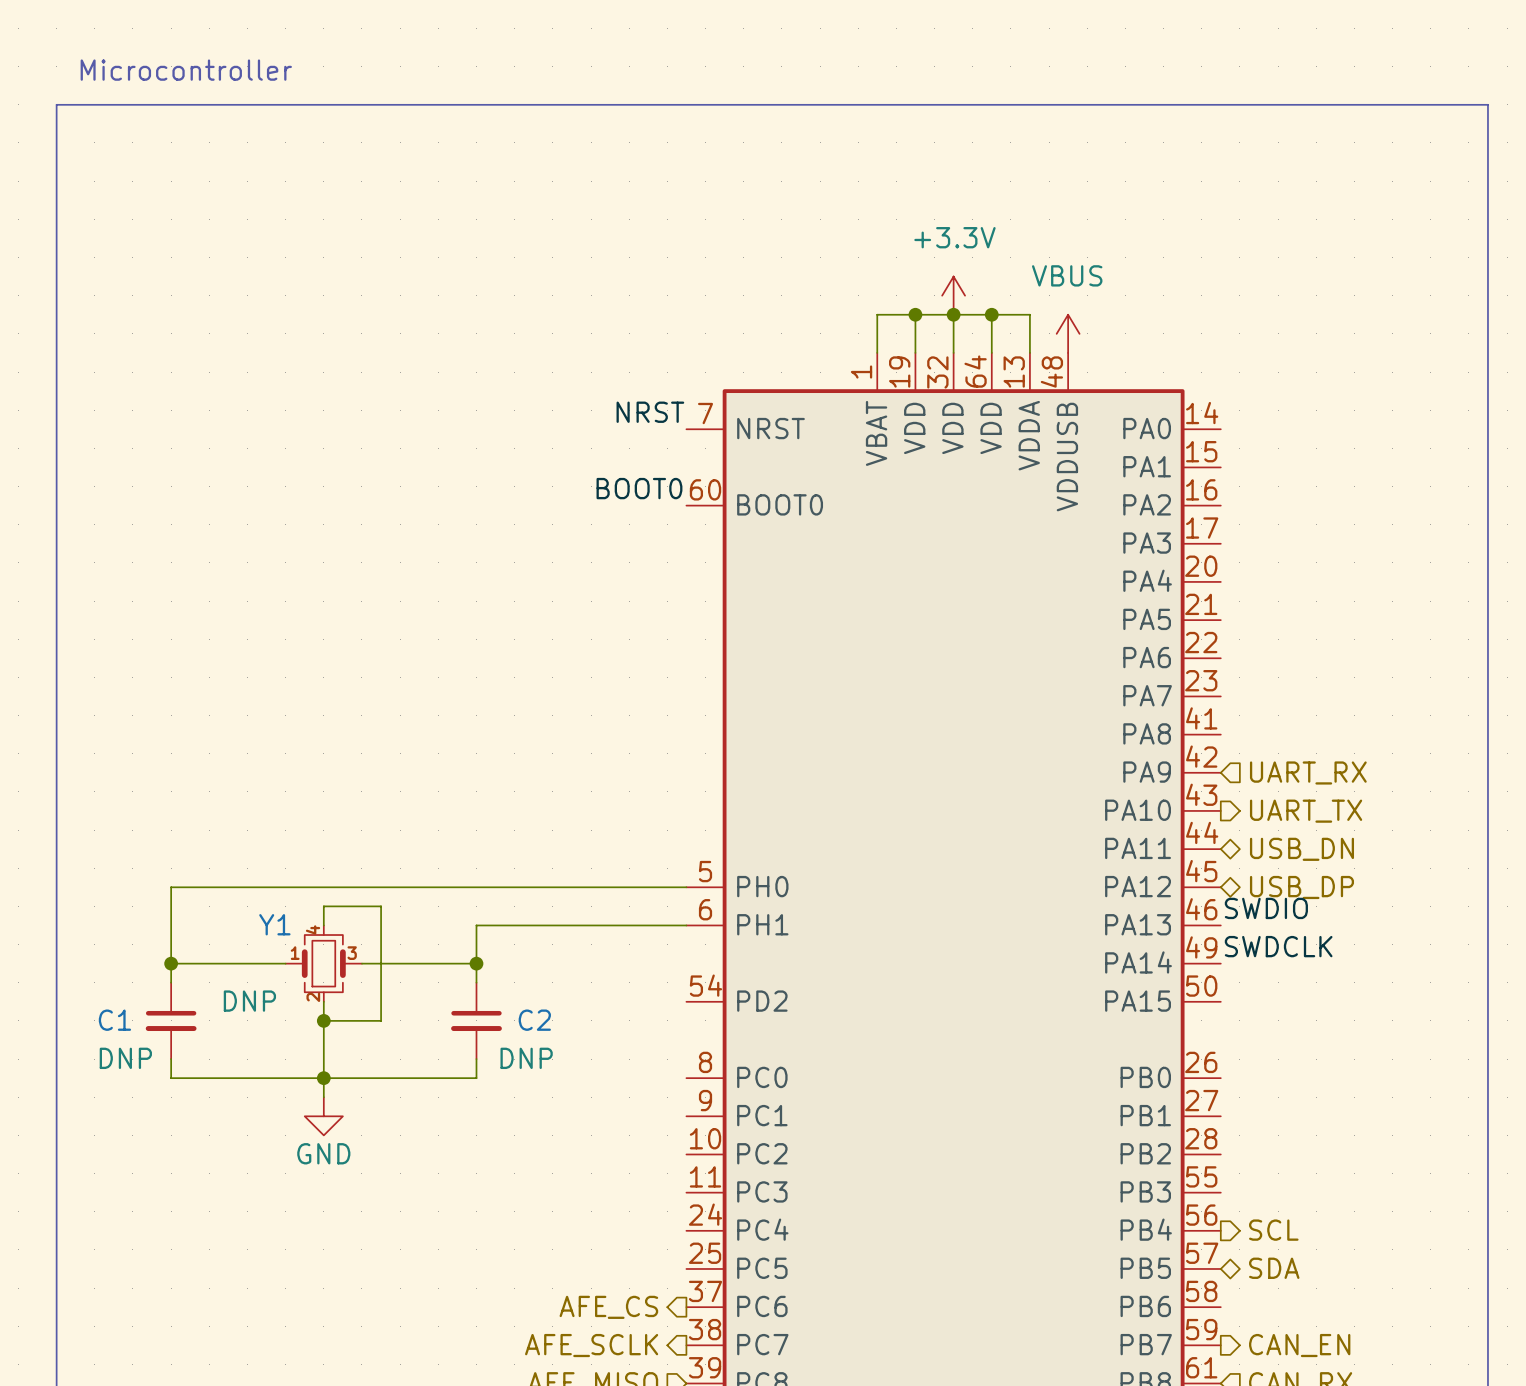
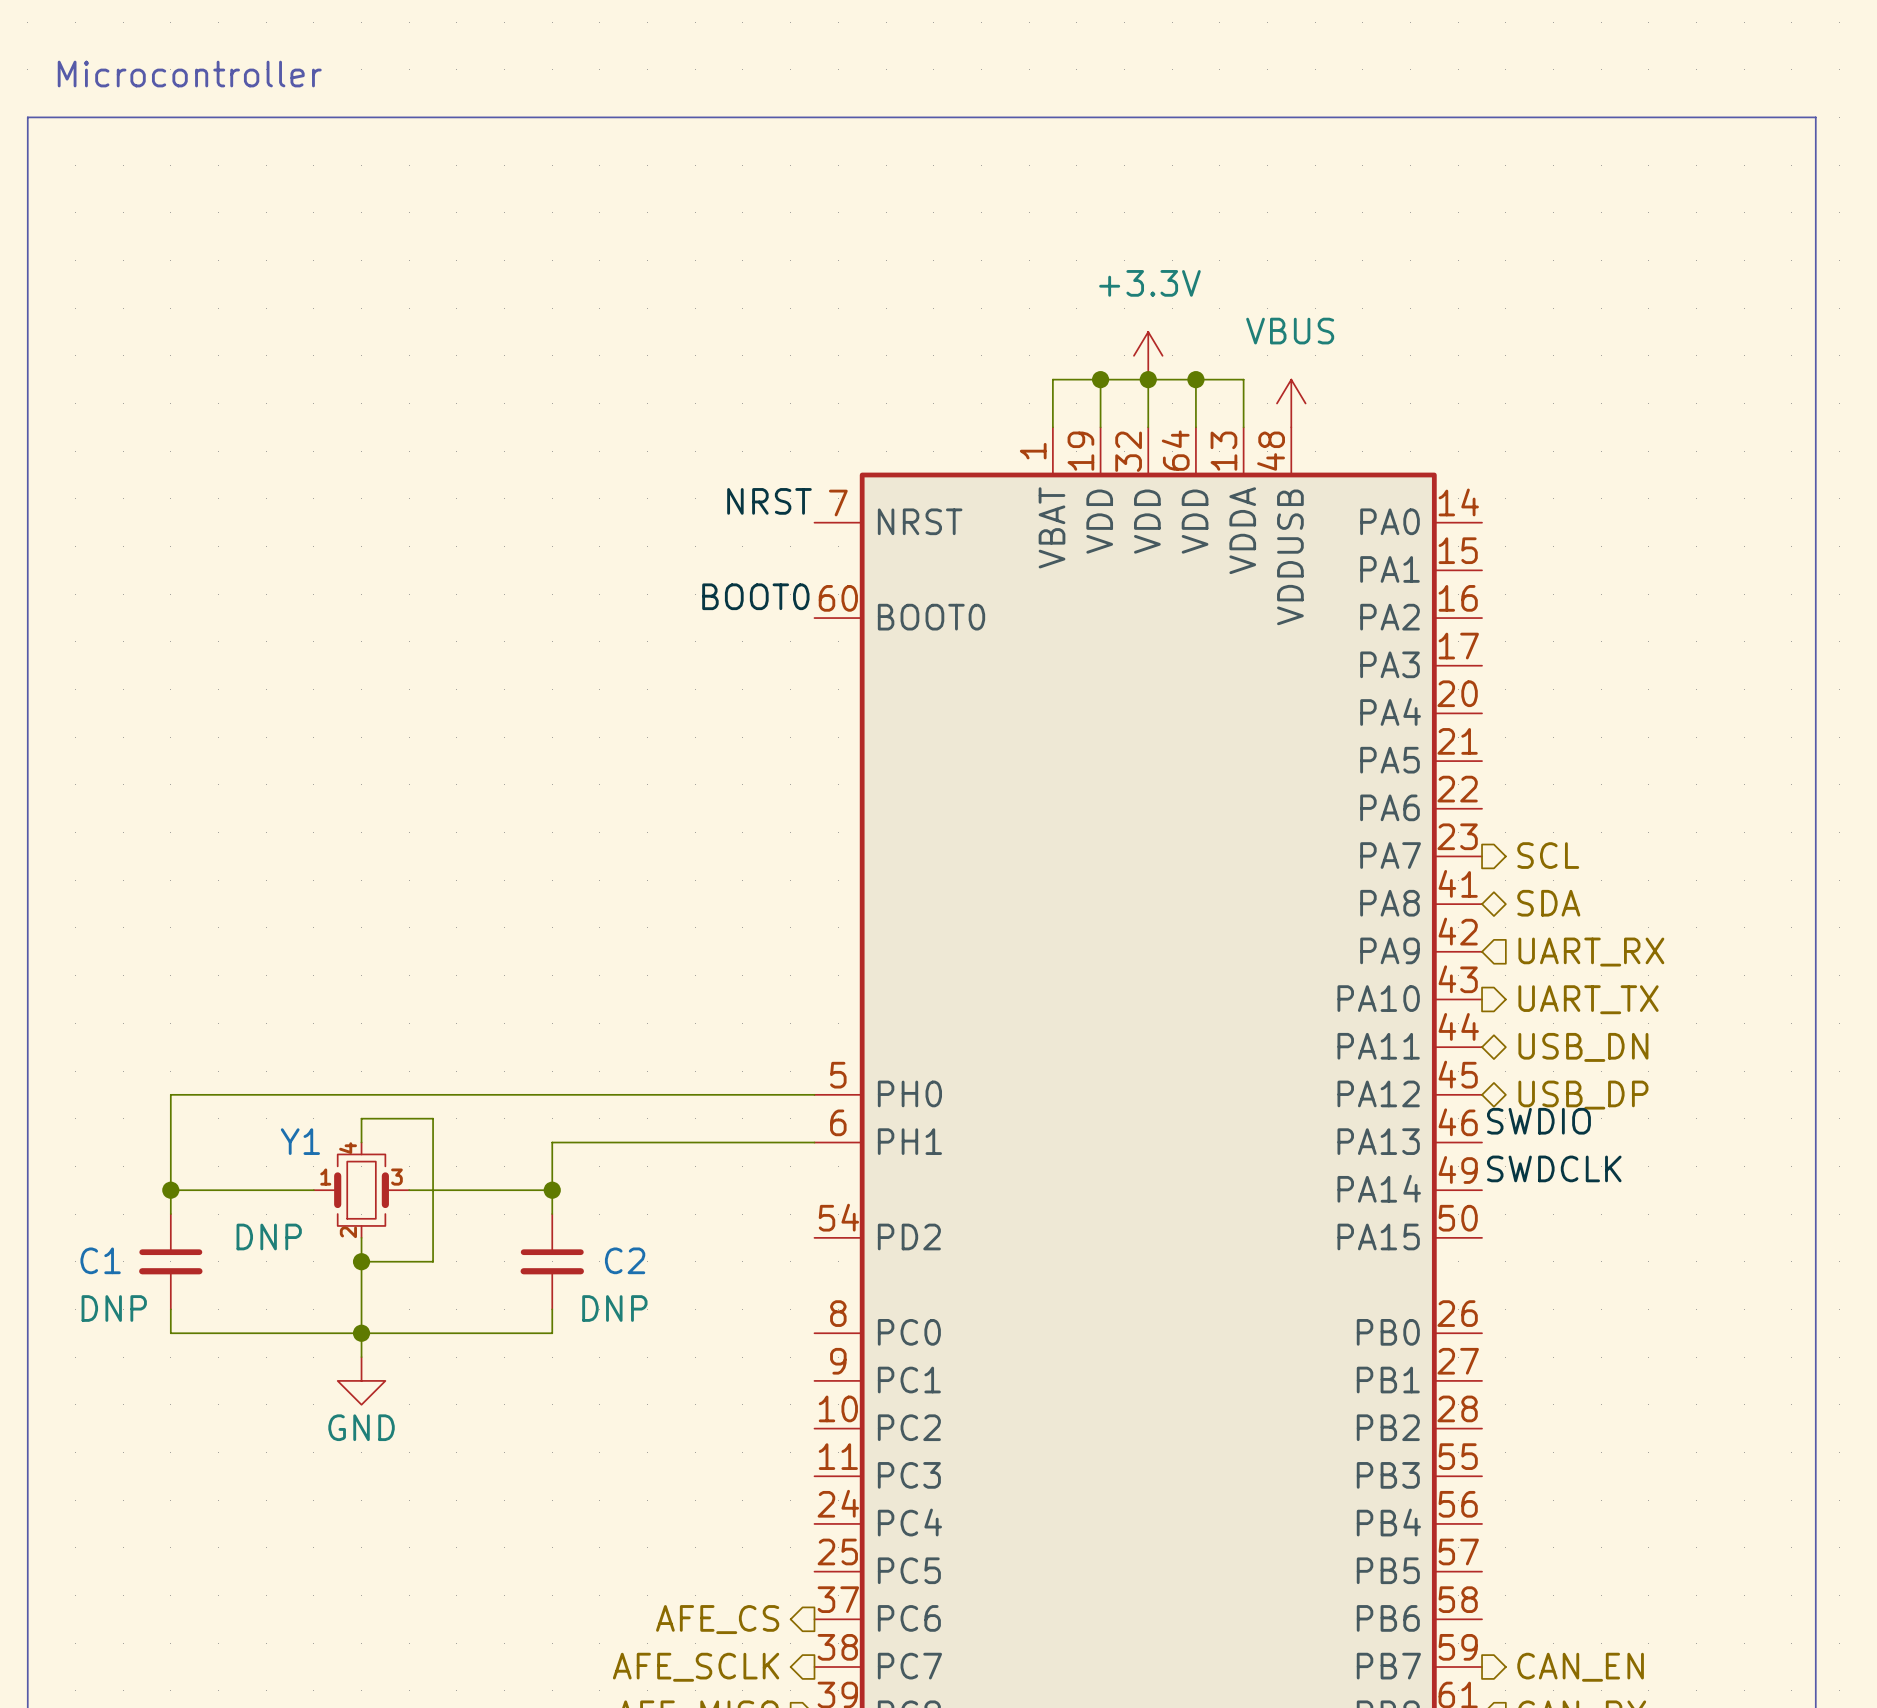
hierarchical label: none -> SCL (1548, 855)
hierarchical label: none -> SDA (1548, 903)
hierarchical label: SCL (1273, 1230) -> none
hierarchical label: SDA (1274, 1268) -> none

